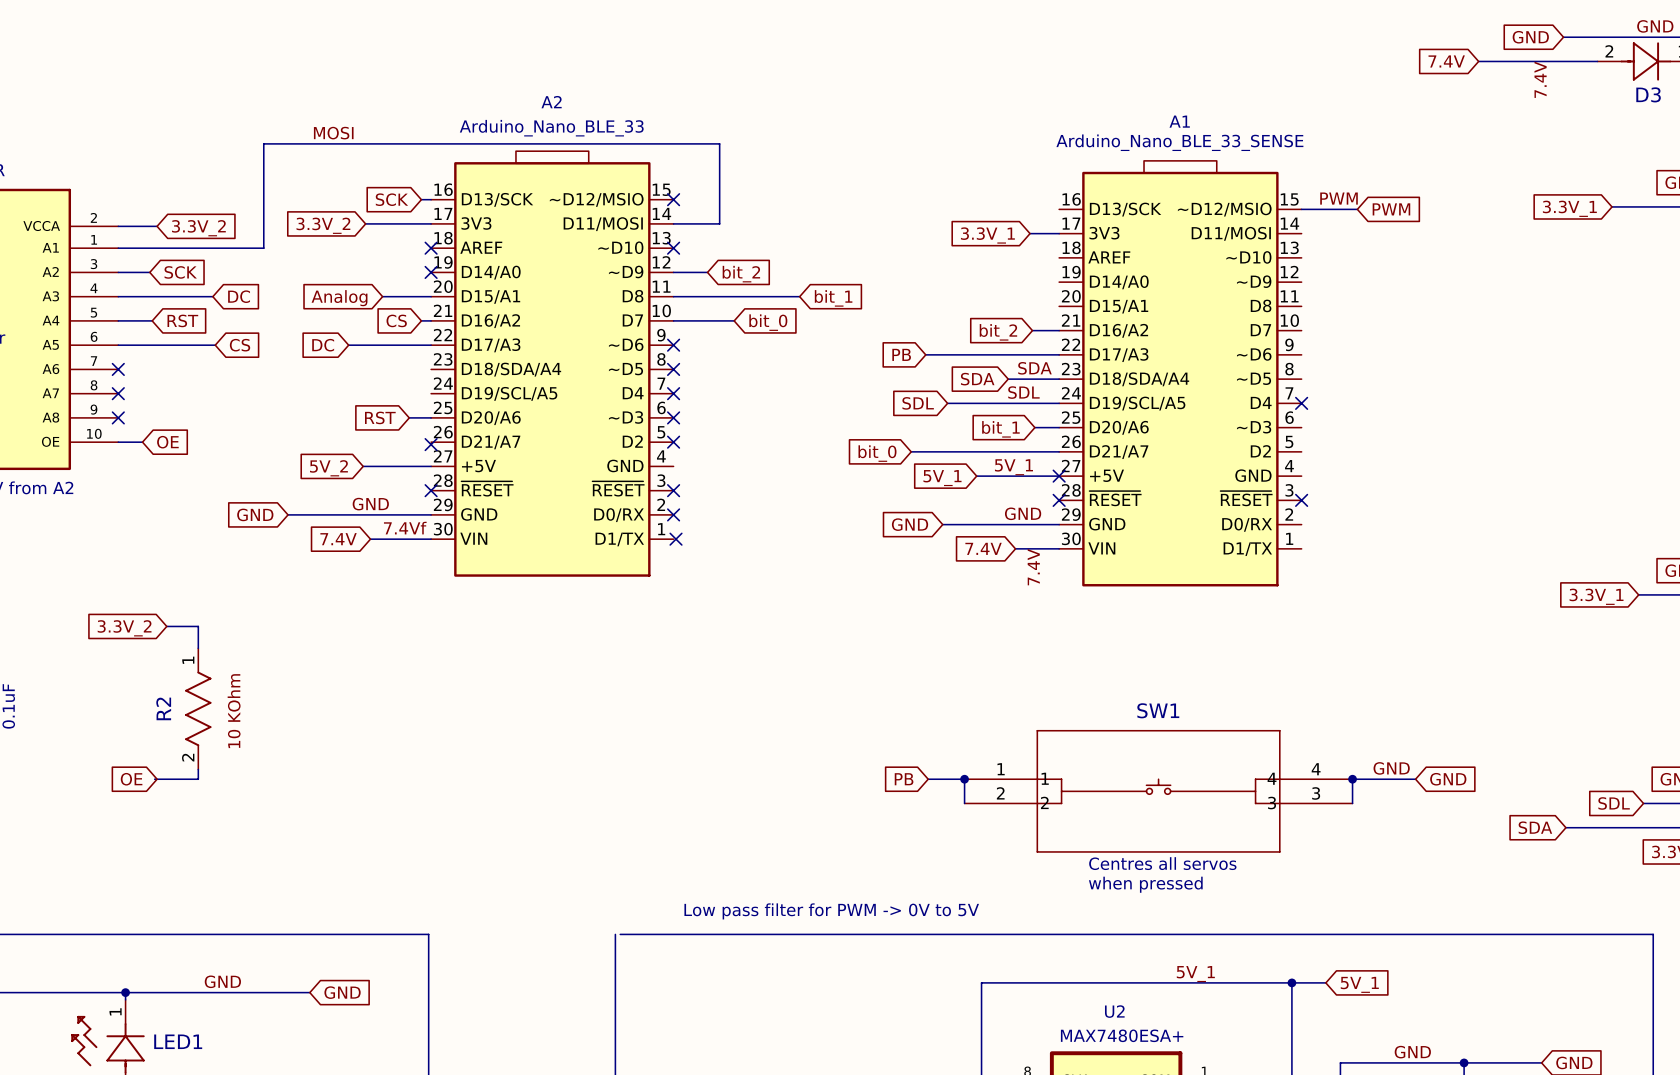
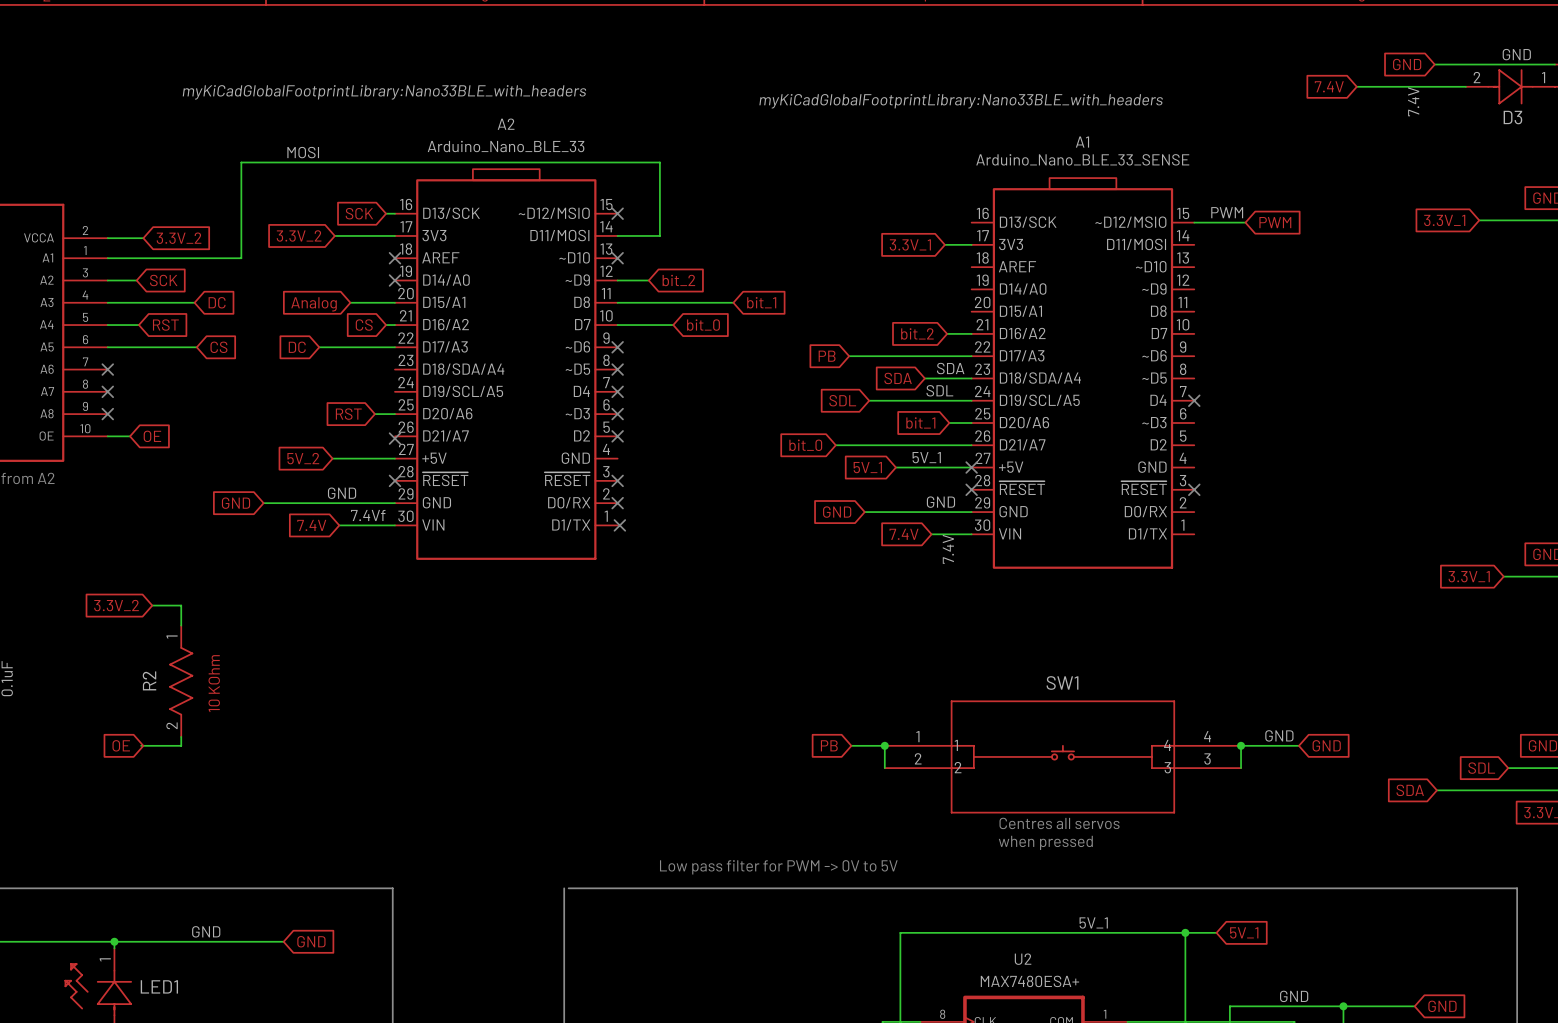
A2 text: none -> myKiCadGlobalFootprintLibrary:Nano33BLE_with_headers (384, 92)
A1 text: none -> myKiCadGlobalFootprintLibrary:Nano33BLE_with_headers (961, 101)

